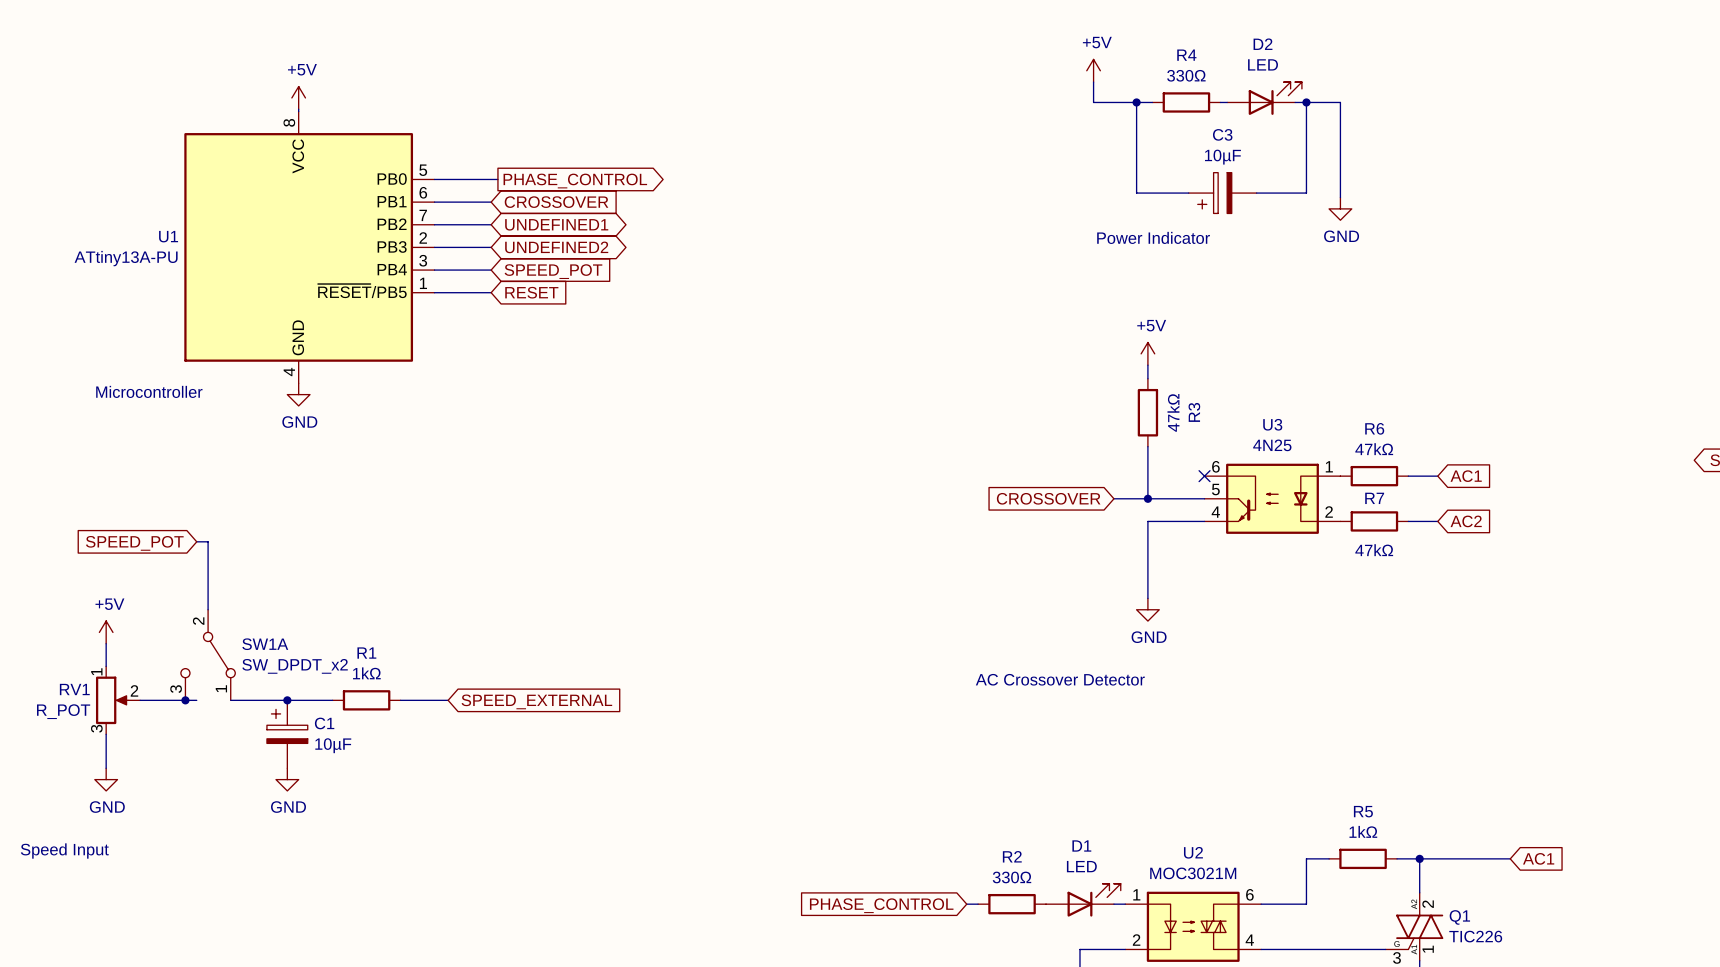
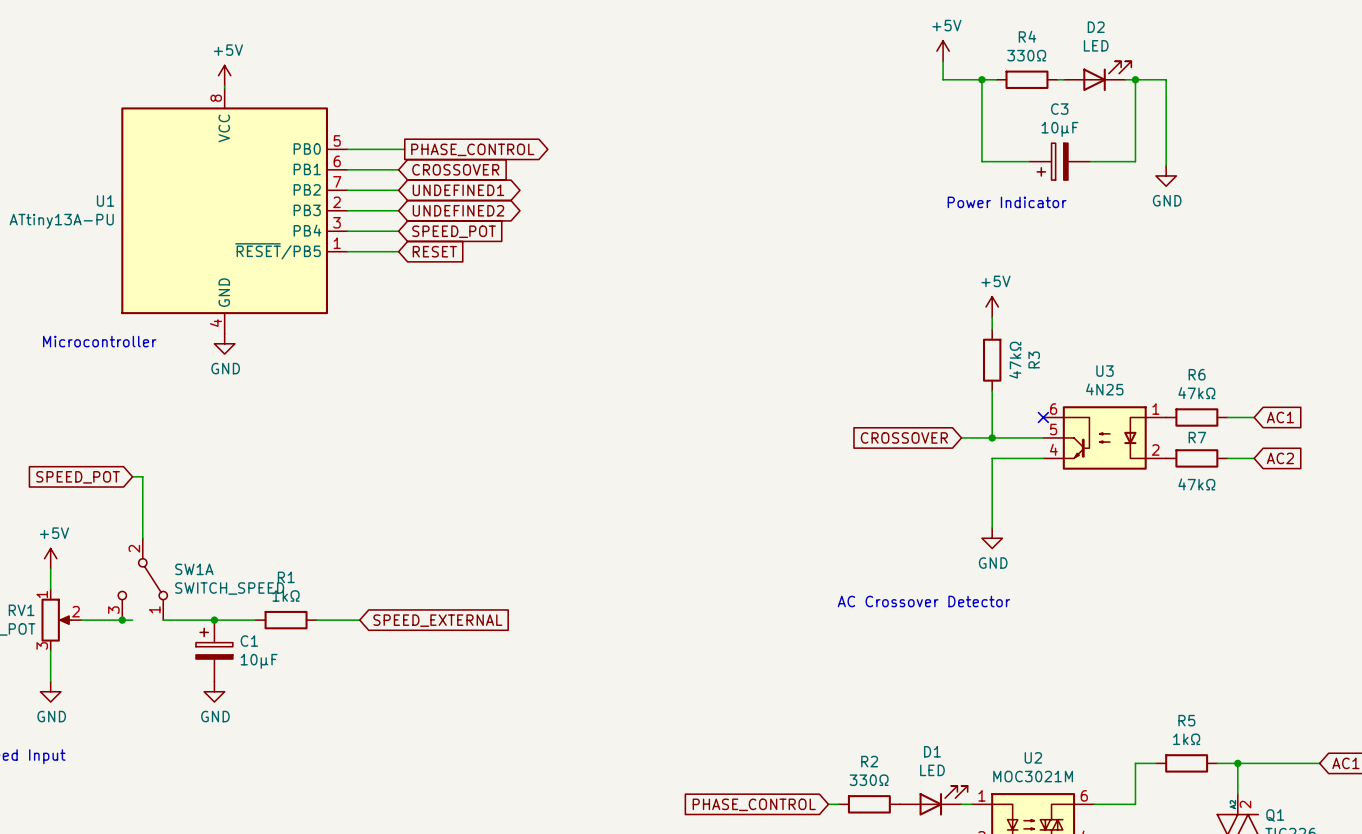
SW1A value: SW_DPDT_x2 (295, 666) -> SWITCH_SPEED (229, 588)

